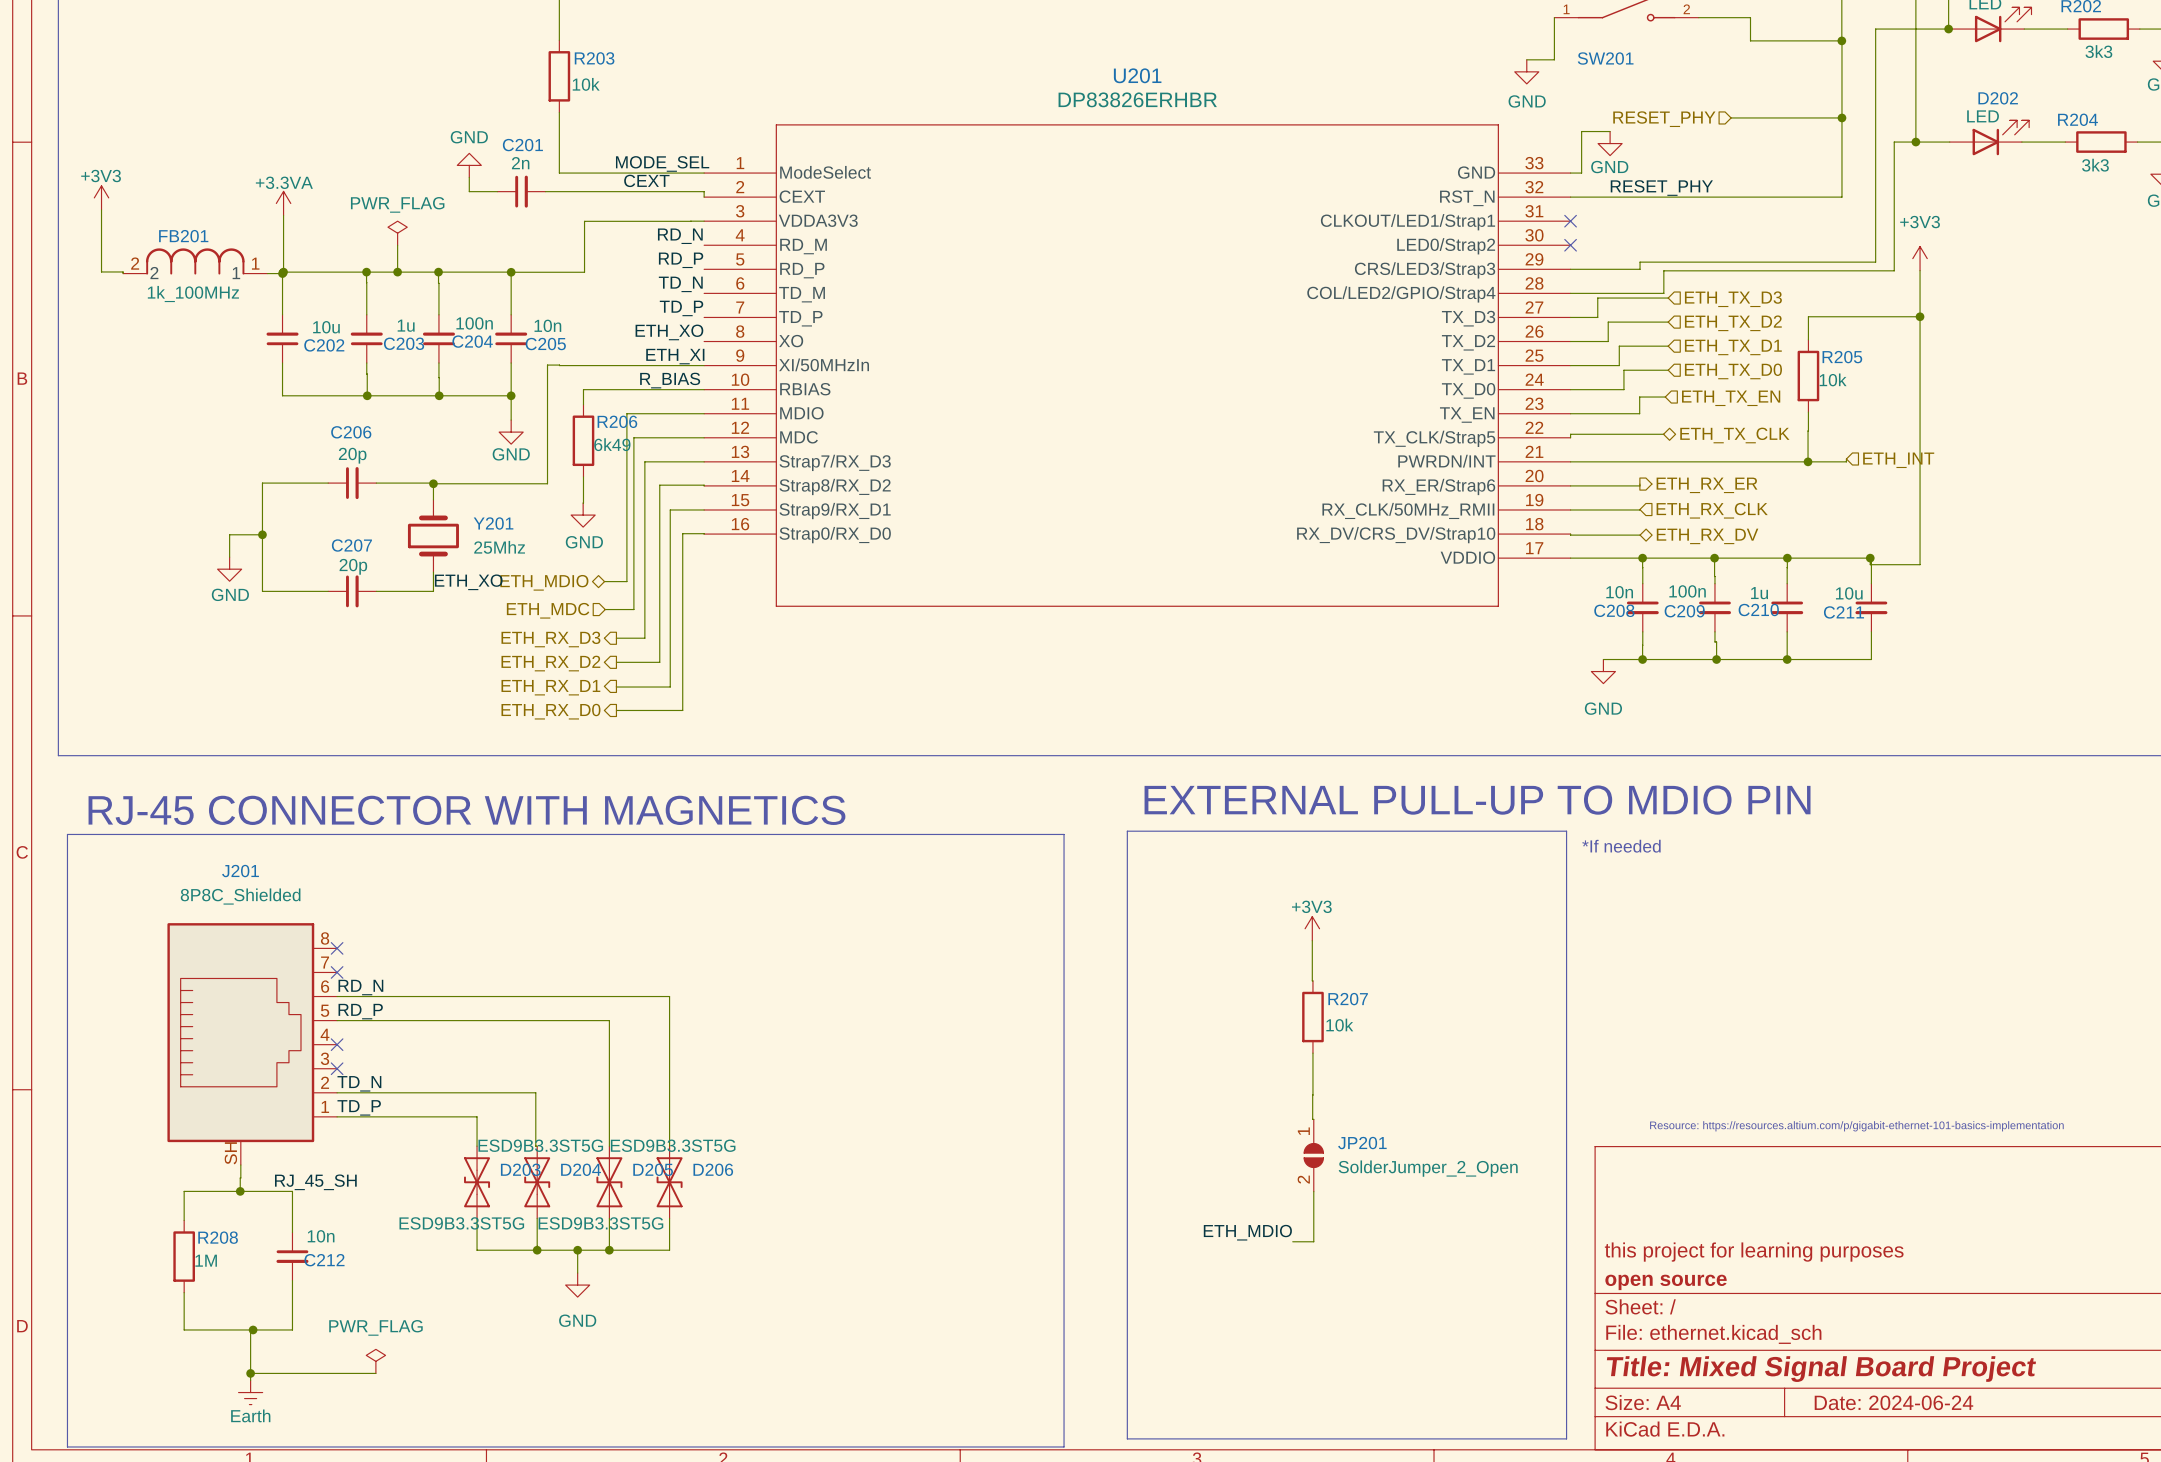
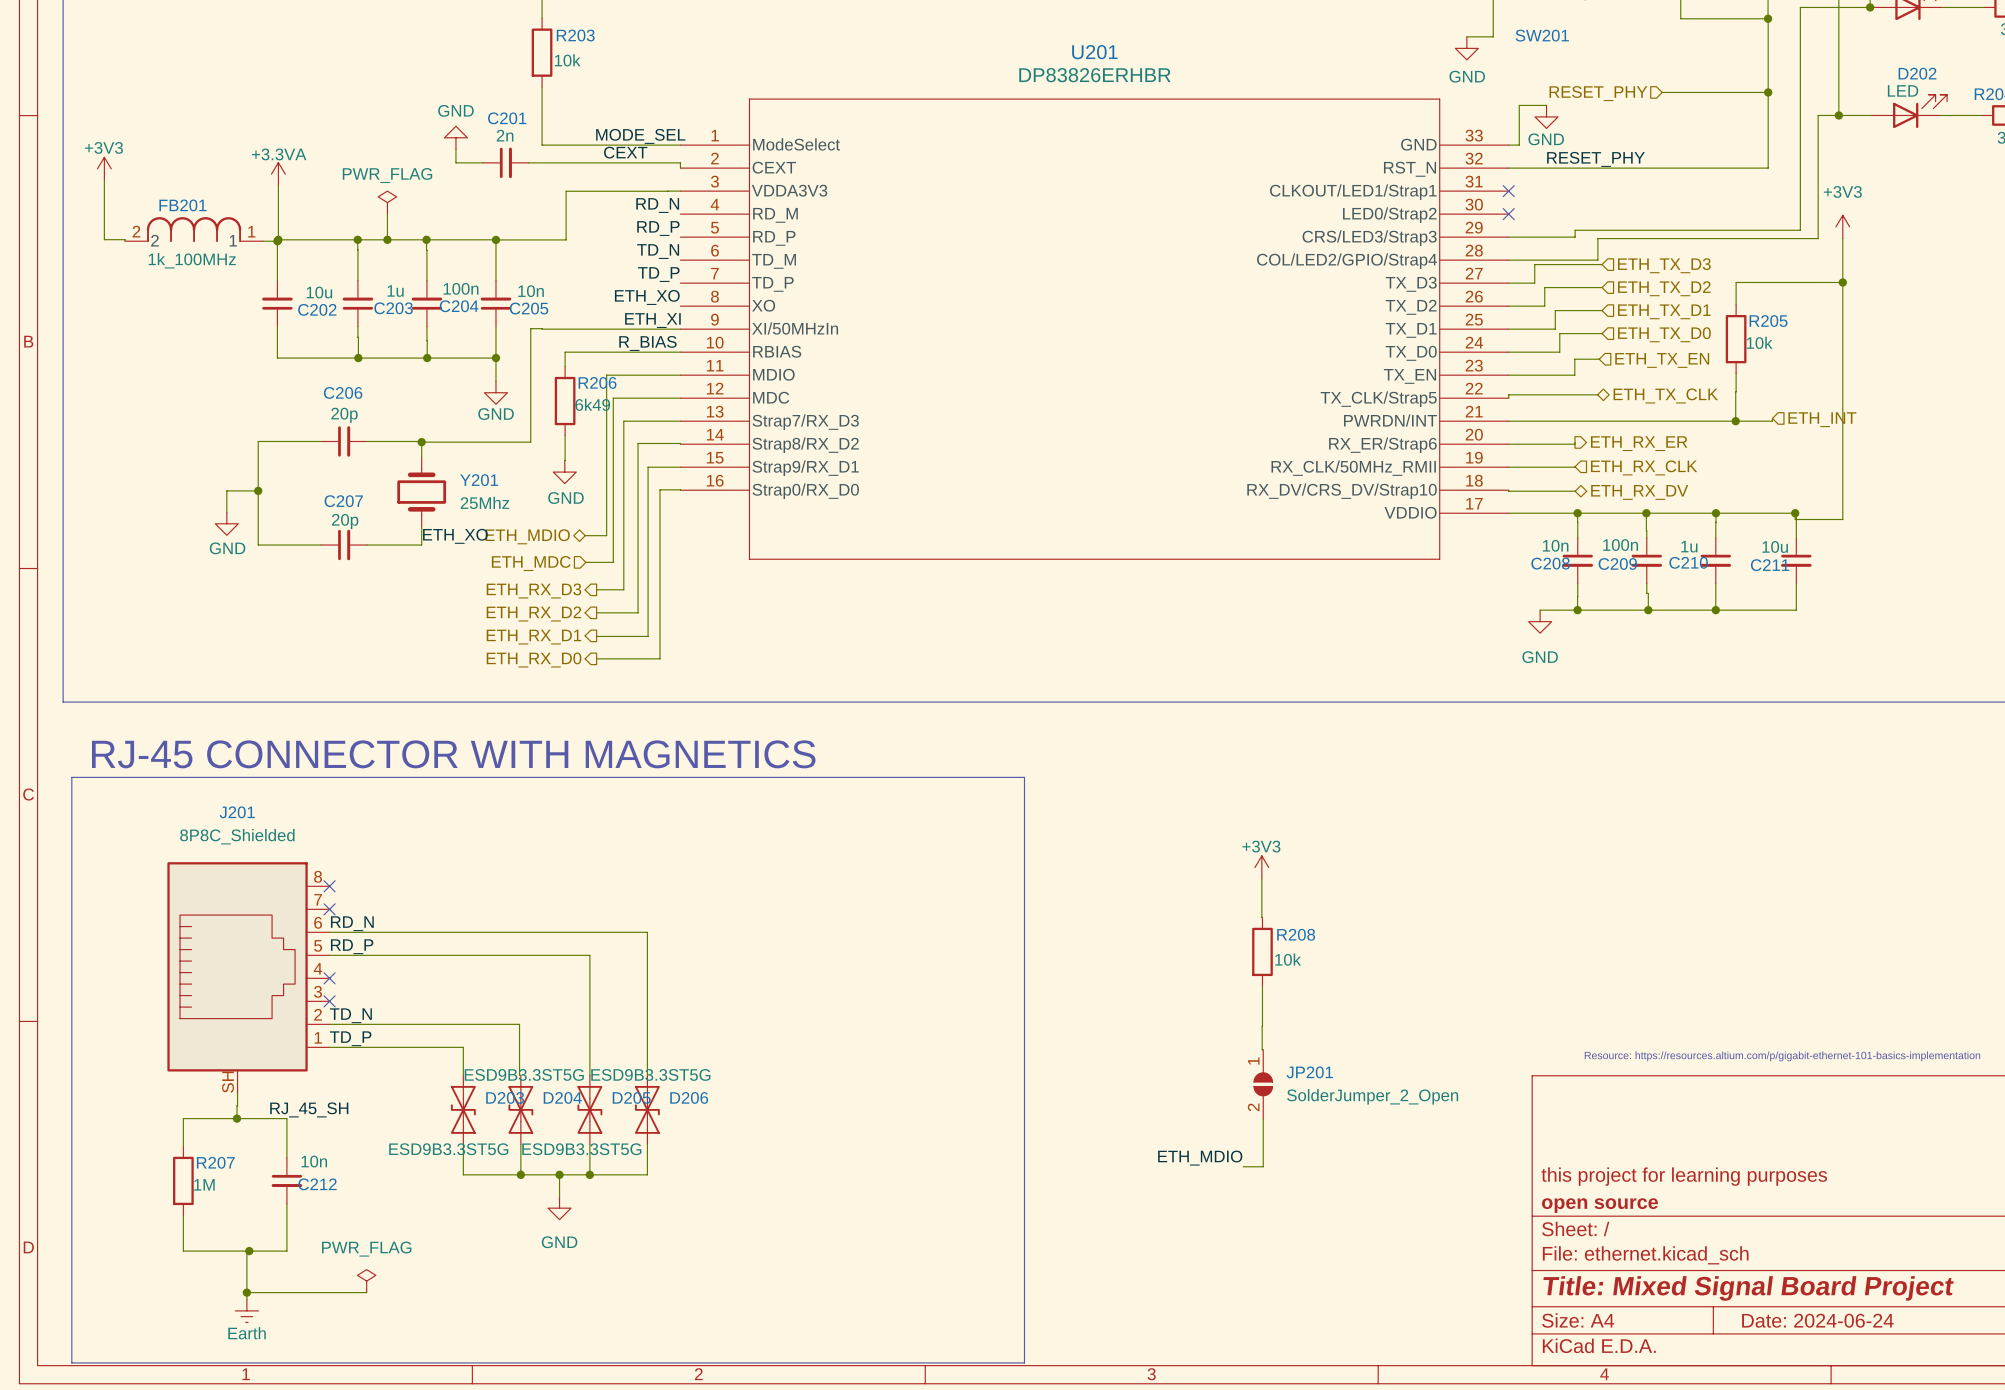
text: EXTERNAL PULL-UP TO MDIO PIN (1477, 800) -> none
line: (1127, 831) (1566, 831) (1566, 1438) (1127, 1438) (1127, 831) -> none
text: *If needed (1621, 846) -> none
R207 name: R207 (1348, 999) -> R208 (1296, 934)
R208 name: R208 (218, 1237) -> R207 (215, 1162)

